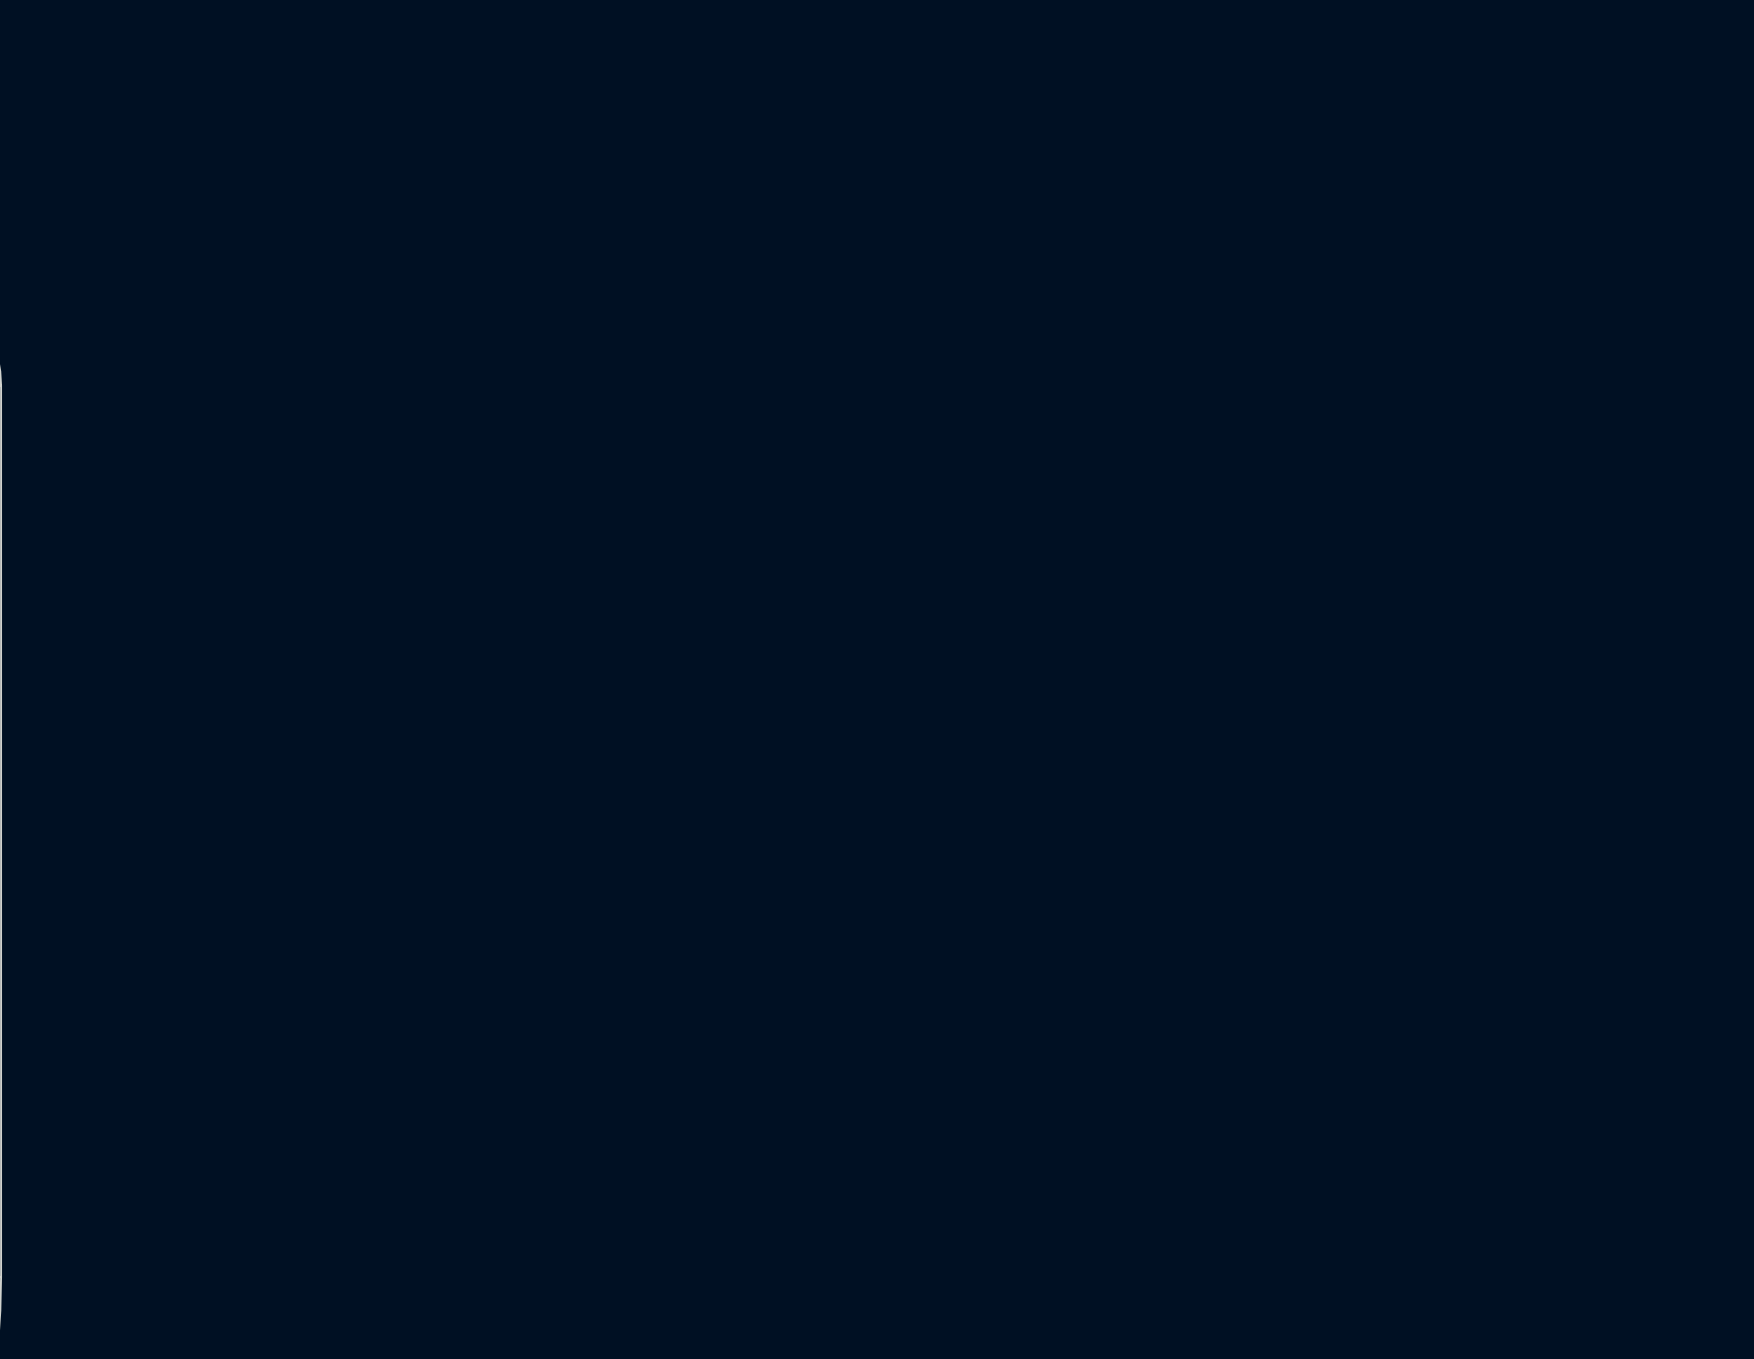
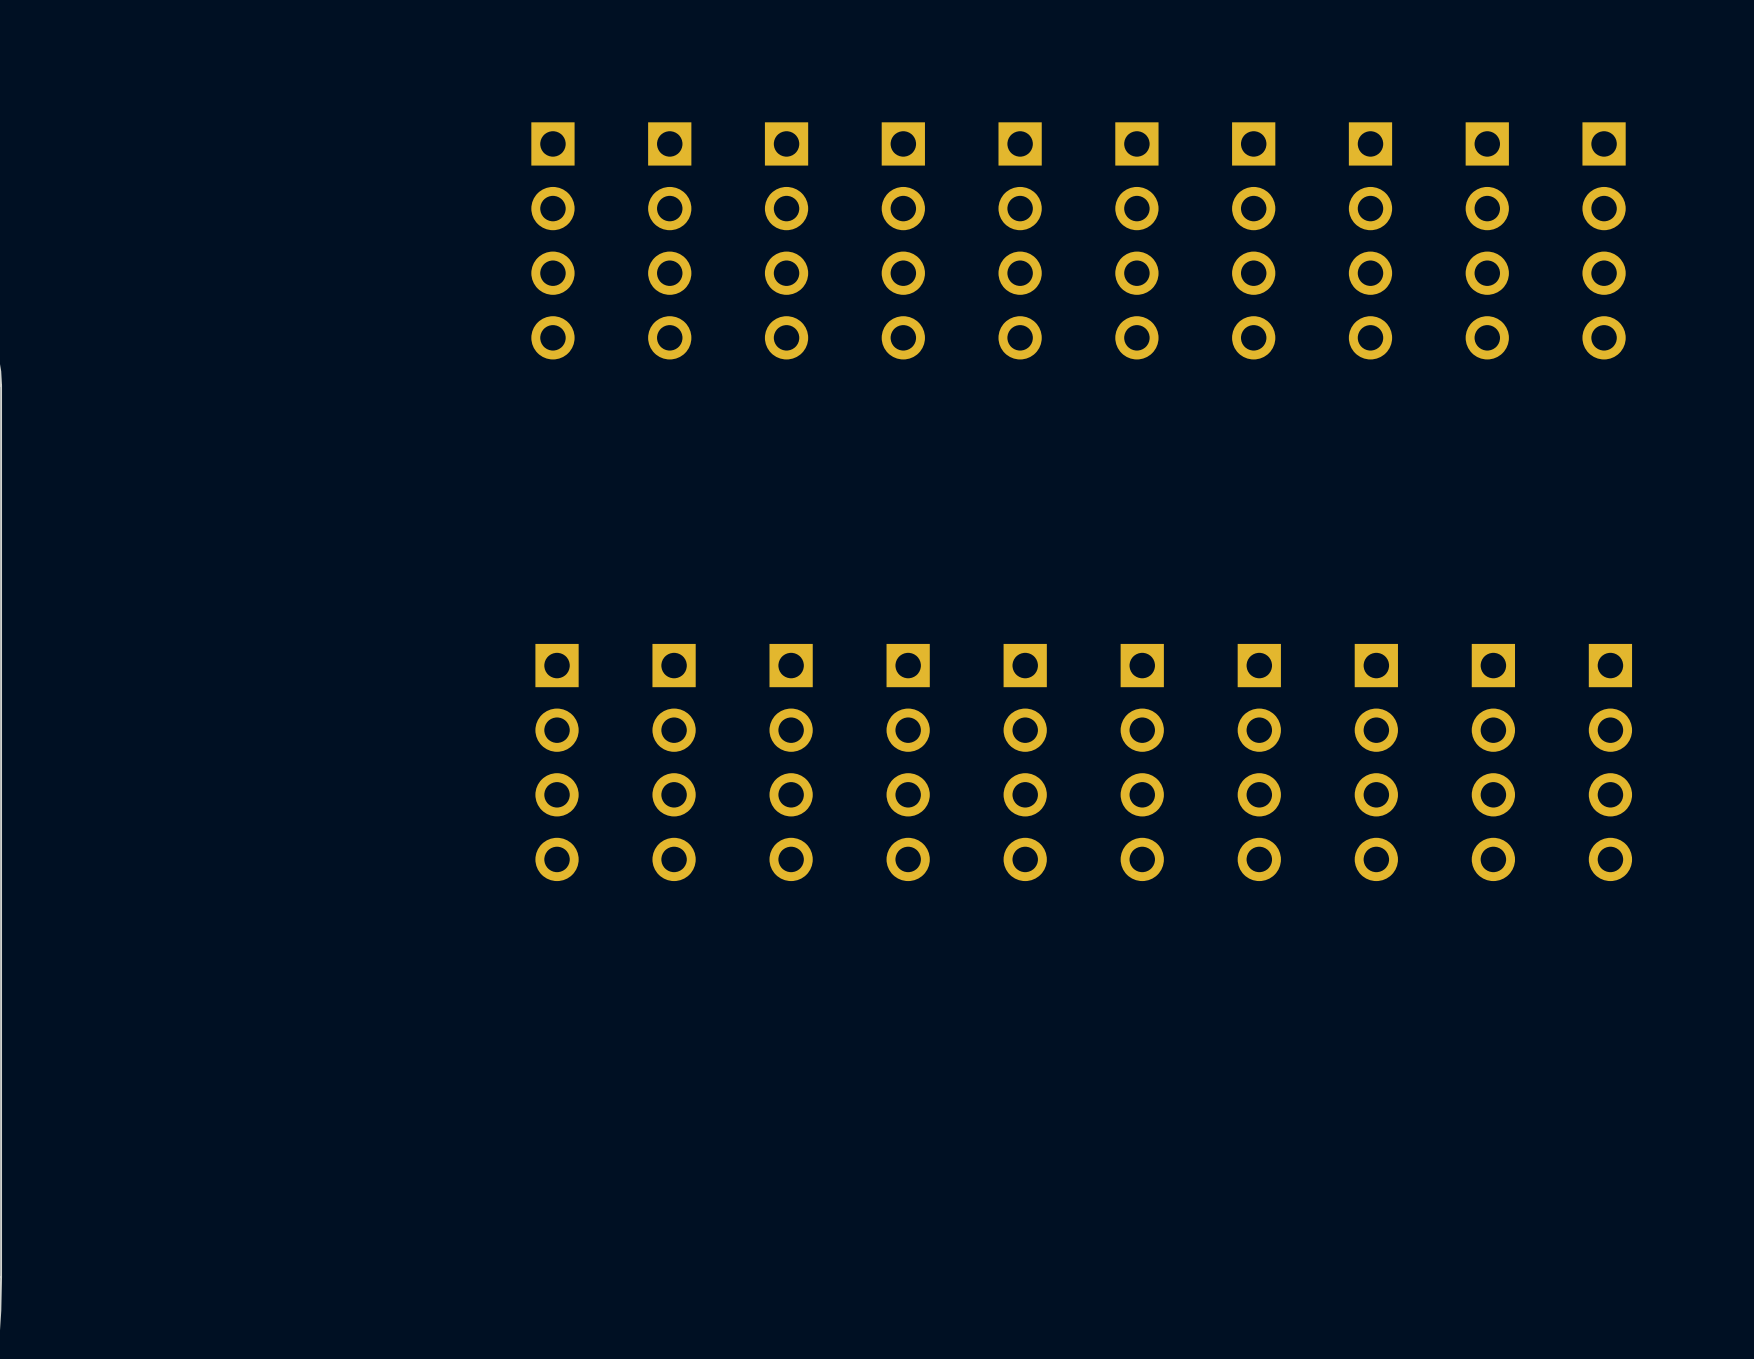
part: none -> (552, 240)
part: none -> (669, 240)
part: none -> (786, 240)
part: none -> (903, 240)
part: none -> (1020, 240)
part: none -> (1136, 240)
part: none -> (1253, 240)
part: none -> (1370, 240)
part: none -> (1487, 240)
part: none -> (1604, 240)
part: none -> (557, 762)
part: none -> (674, 762)
part: none -> (791, 762)
part: none -> (908, 762)
part: none -> (1025, 762)
part: none -> (1142, 762)
part: none -> (1259, 762)
part: none -> (1376, 762)
part: none -> (1493, 762)
part: none -> (1610, 762)

